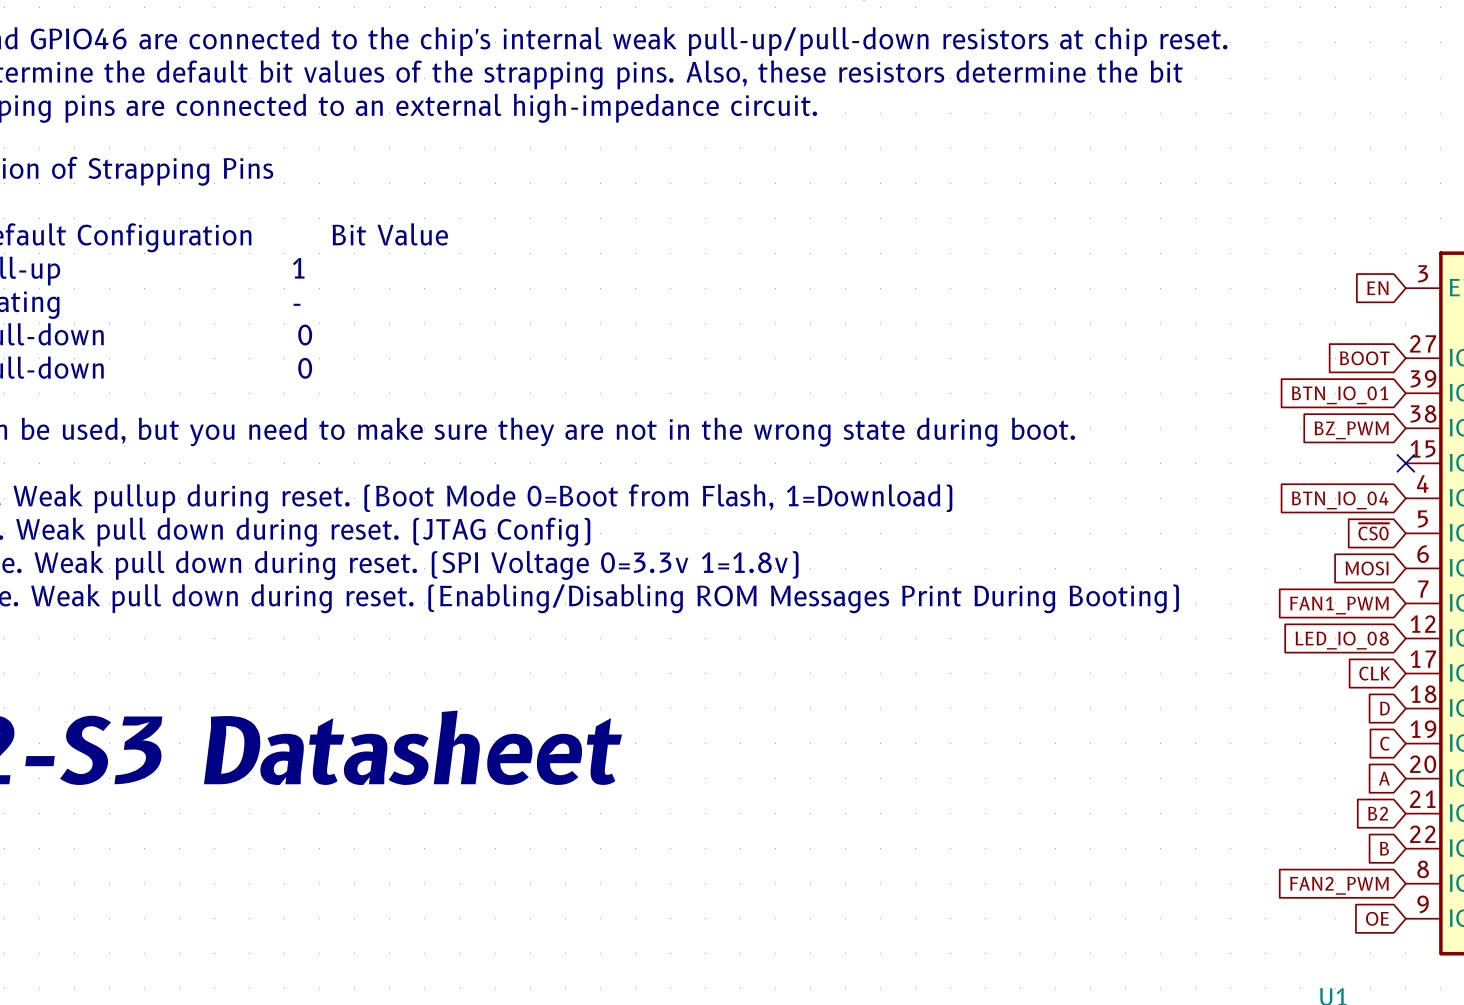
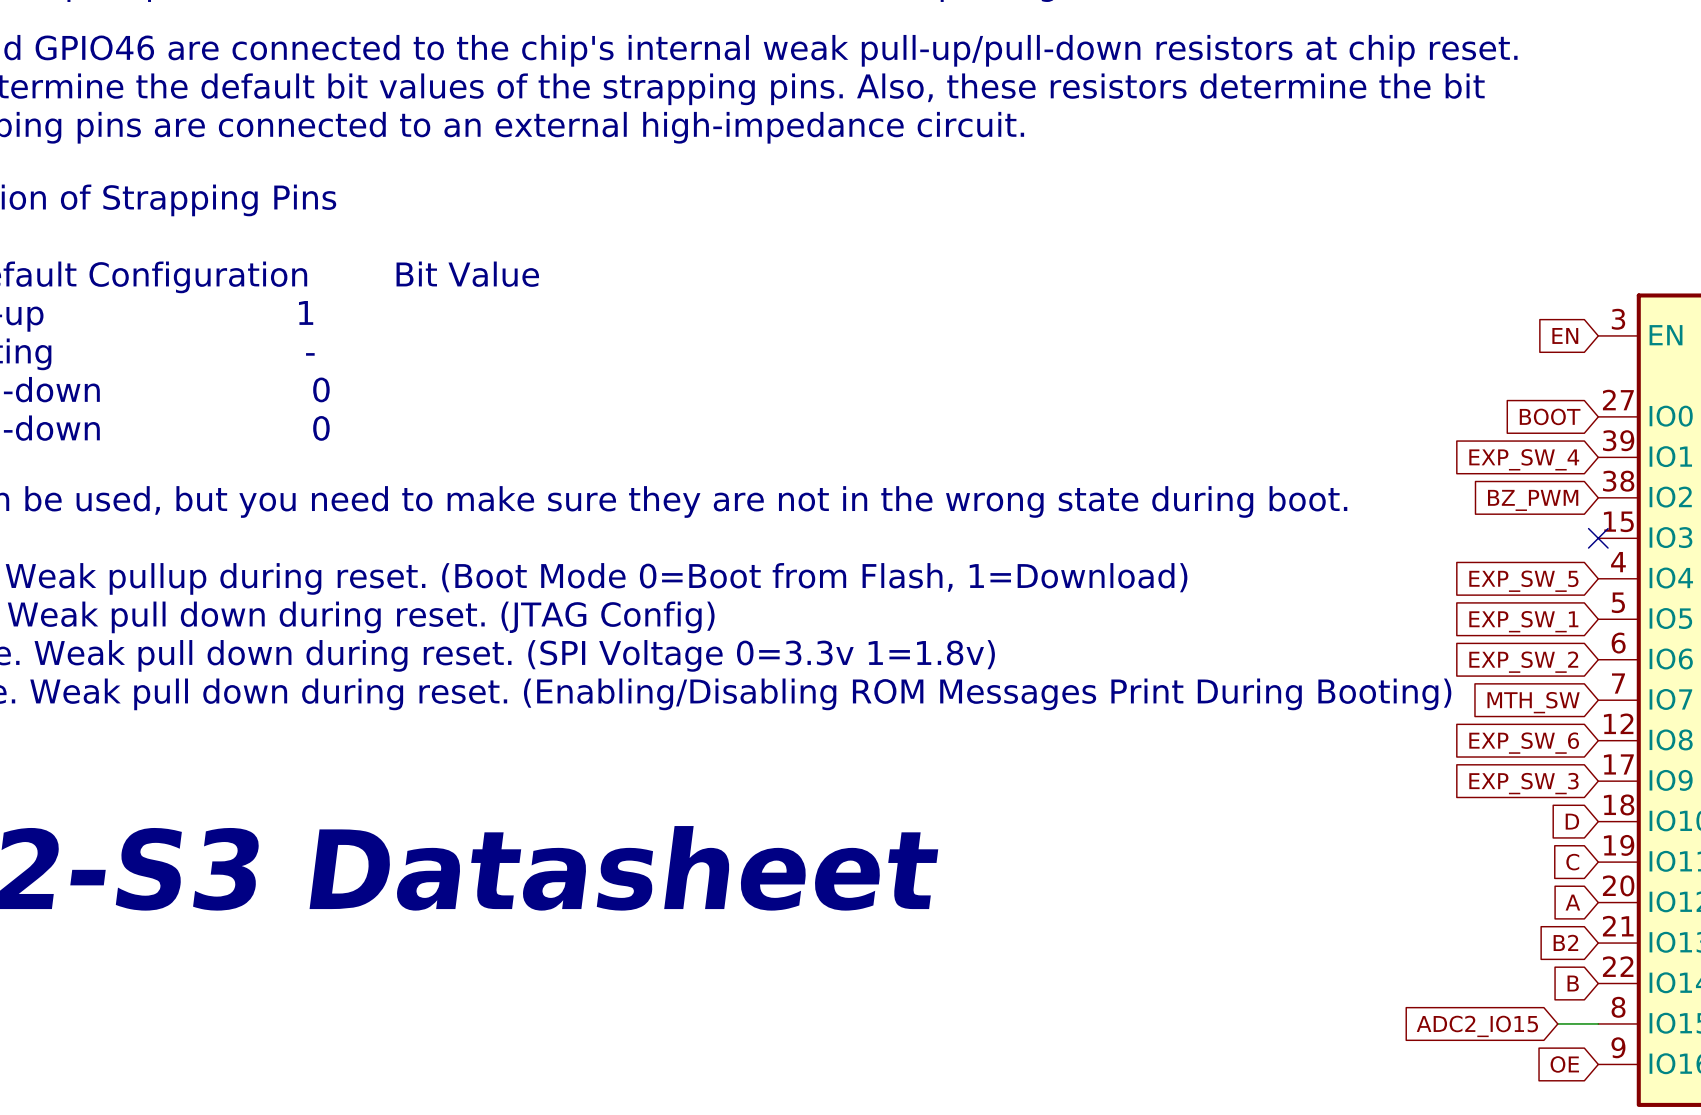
global label: BTN_IO_01 (1340, 395) -> EXP_SW_4 (1524, 459)
global label: BTN_IO_04 (1340, 500) -> EXP_SW_5 (1523, 581)
global label: ~{CS0} (1373, 531) -> EXP_SW_1 (1523, 621)
global label: MOSI (1367, 568) -> EXP_SW_2 (1523, 662)
global label: FAN1_PWM (1339, 605) -> MTH_SW (1533, 702)
global label: LED_IO_08 (1342, 640) -> EXP_SW_6 (1524, 743)
global label: CLK (1374, 673) -> EXP_SW_3 (1523, 783)
wire: none -> (1557, 1023) (1598, 1023)
global label: none -> ADC2_IO15 (1477, 1026)
global label: FAN2_PWM (1339, 885) -> none

